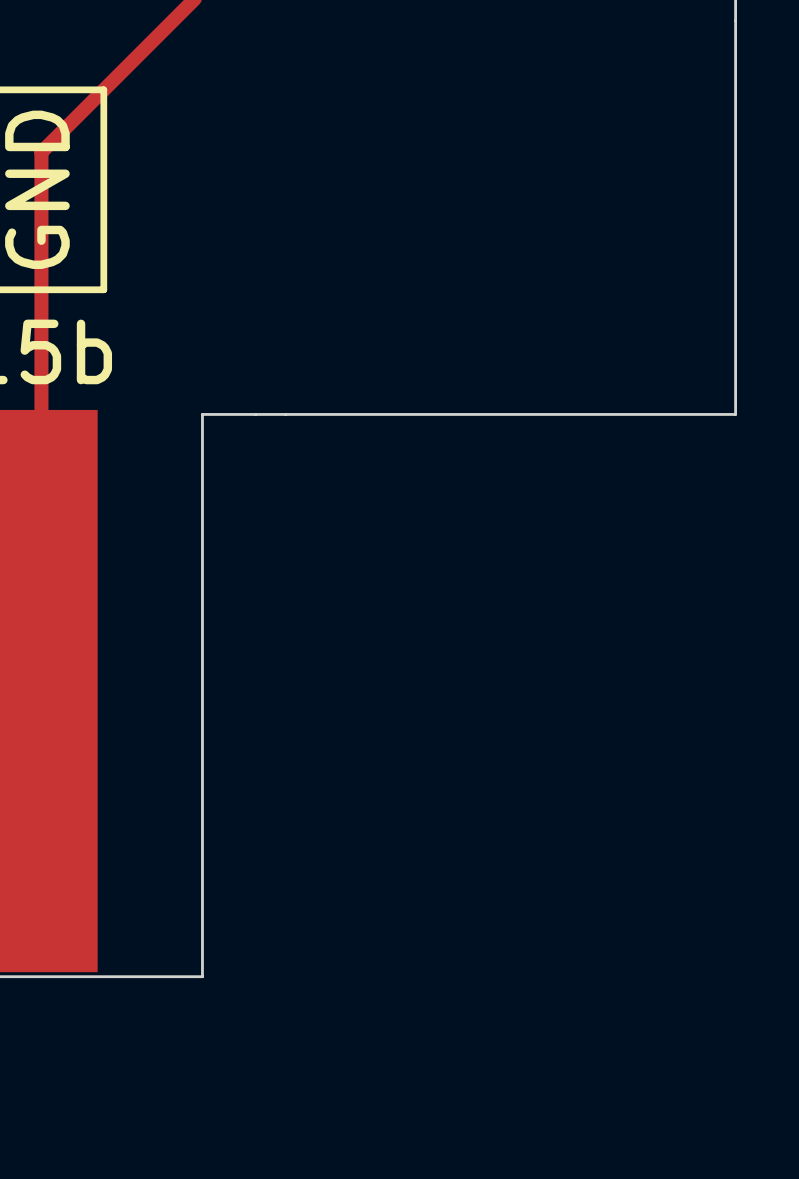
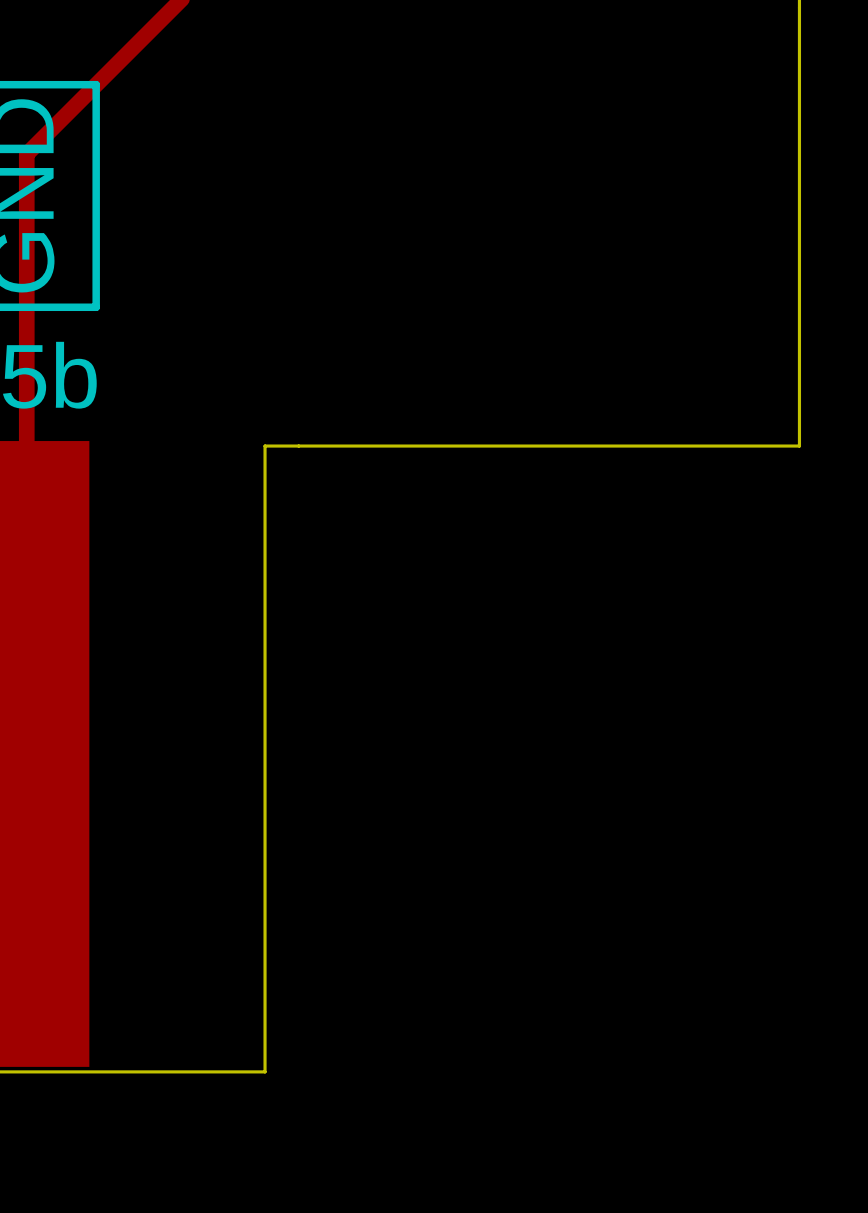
board edge: (255, 414) (202, 414) (202, 976) -> (265, 446) (265, 1071) (206, 1071)

